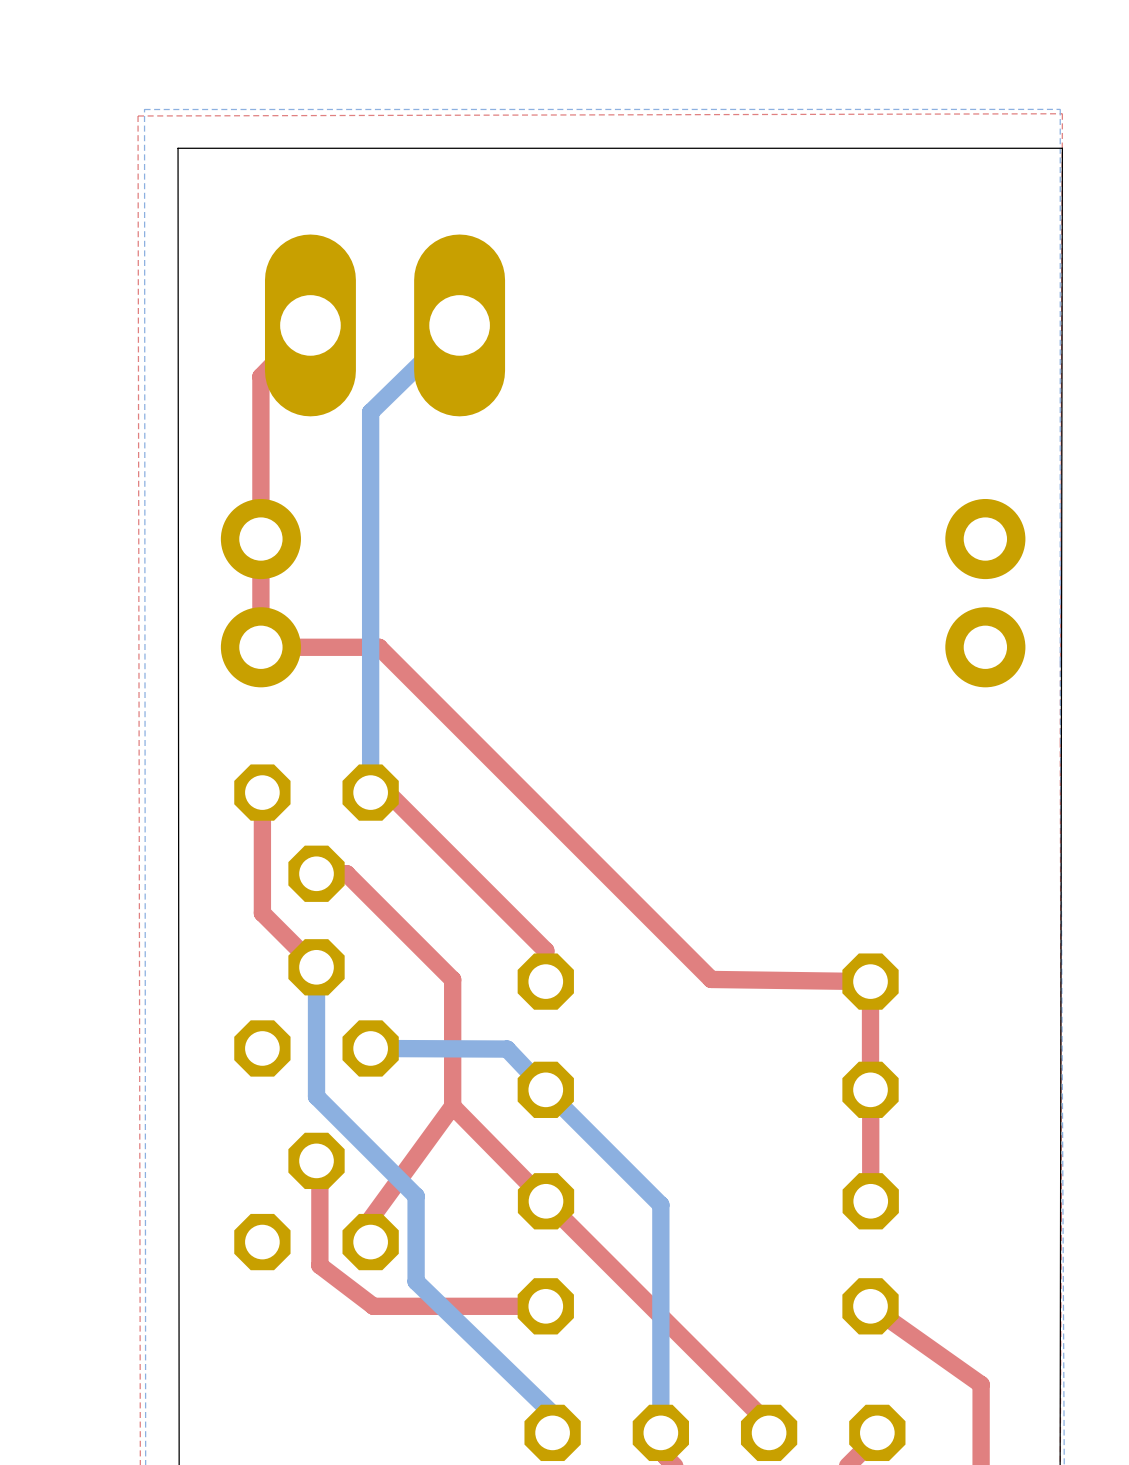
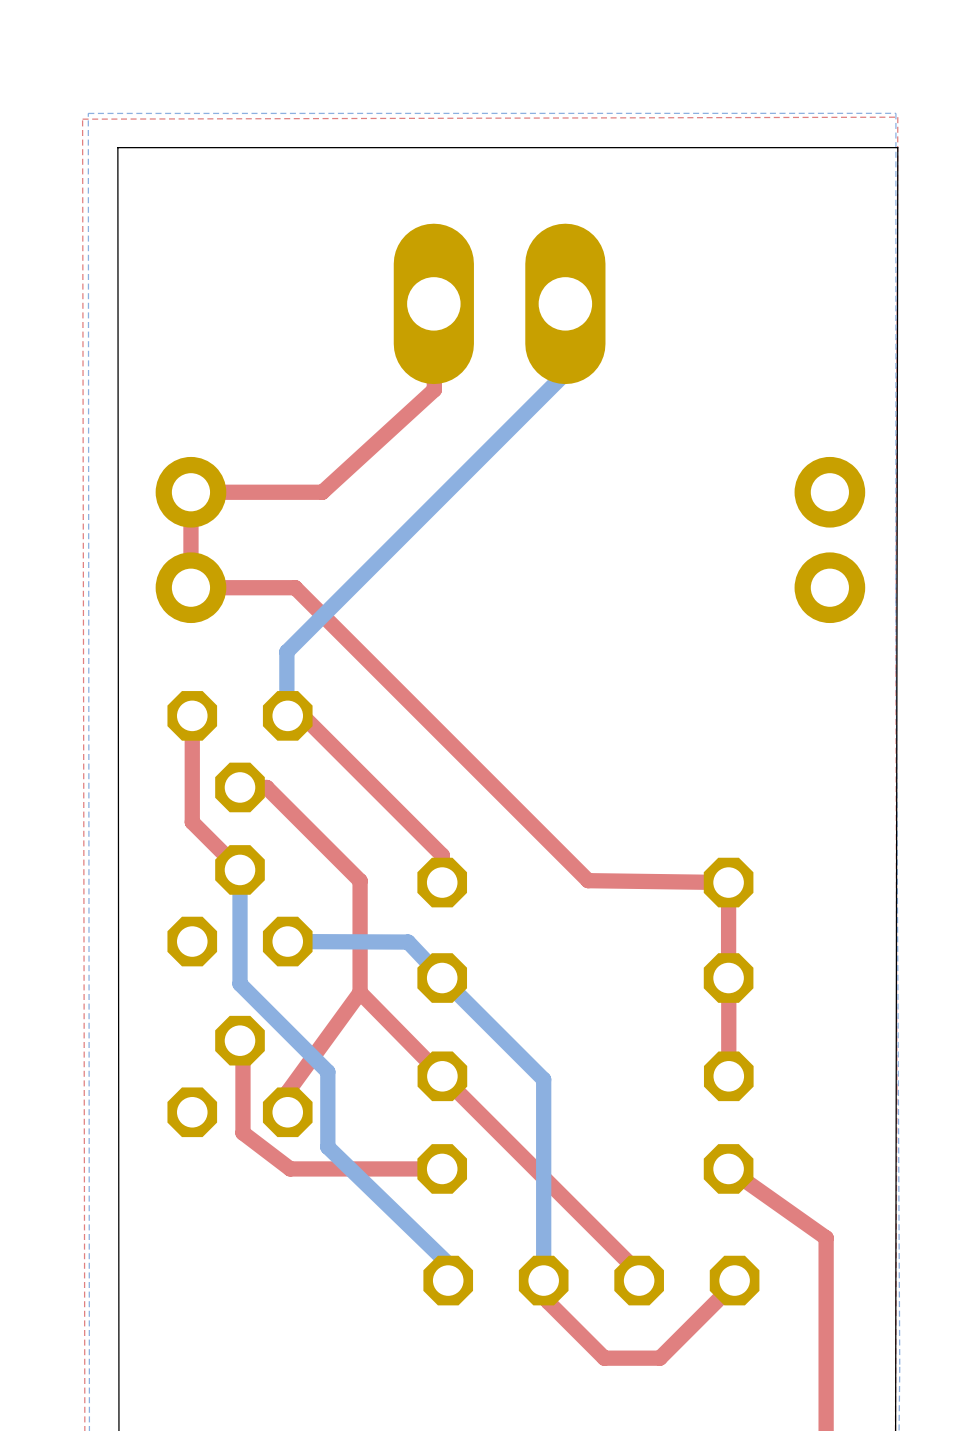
top track: (310, 325) (260, 376) (260, 539) -> (433, 303) (434, 389) (322, 492) (190, 492)
part position: (385, 325) -> (499, 303)
bottom track: (459, 325) (370, 412) (370, 792) (370, 779) -> none
bottom track: none -> (565, 303) (565, 373) (286, 651) (287, 715)

